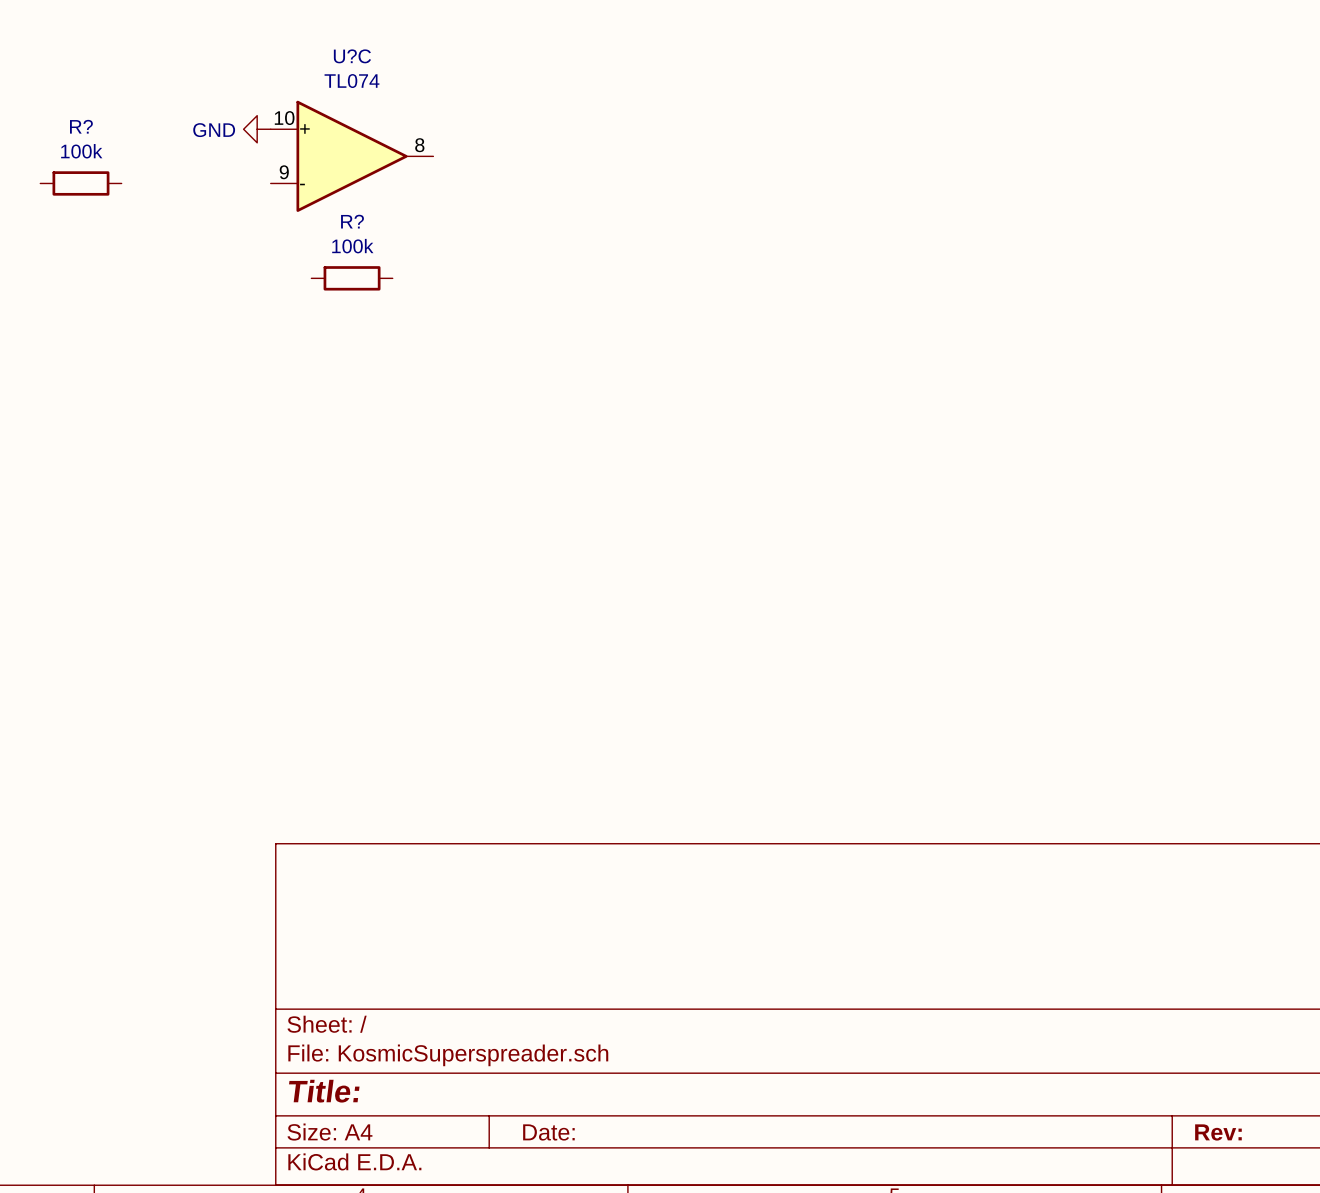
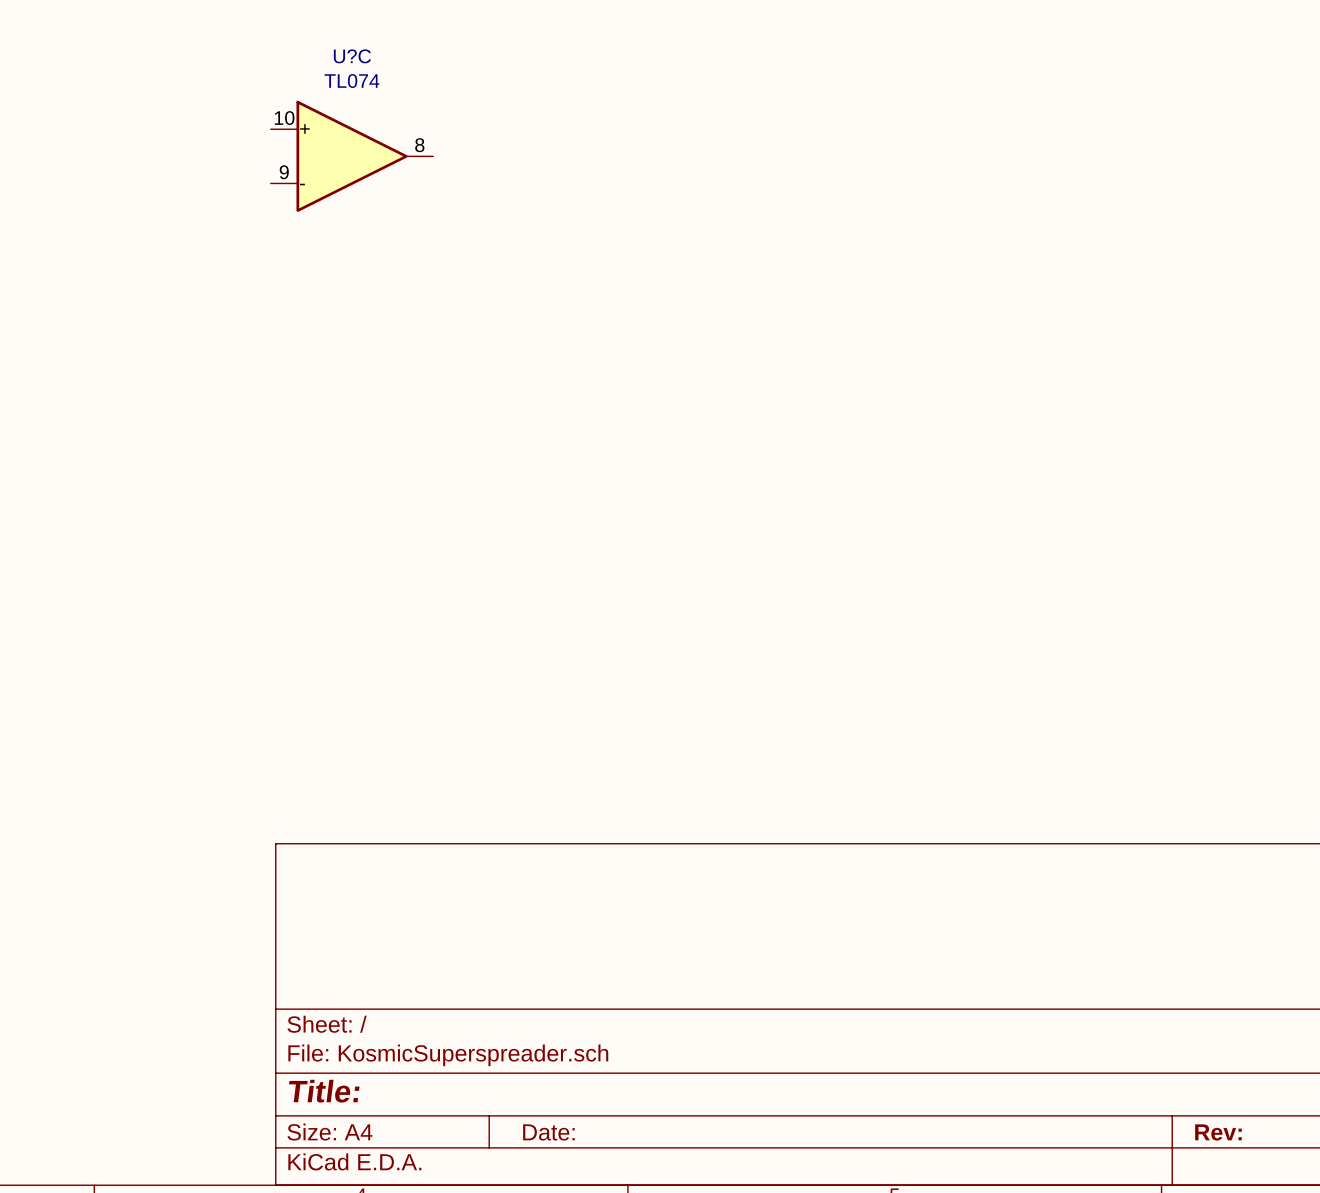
power symbol: GND (257, 129) -> none
R?: 100k (80, 183) -> none
R?: 100k (352, 278) -> none

